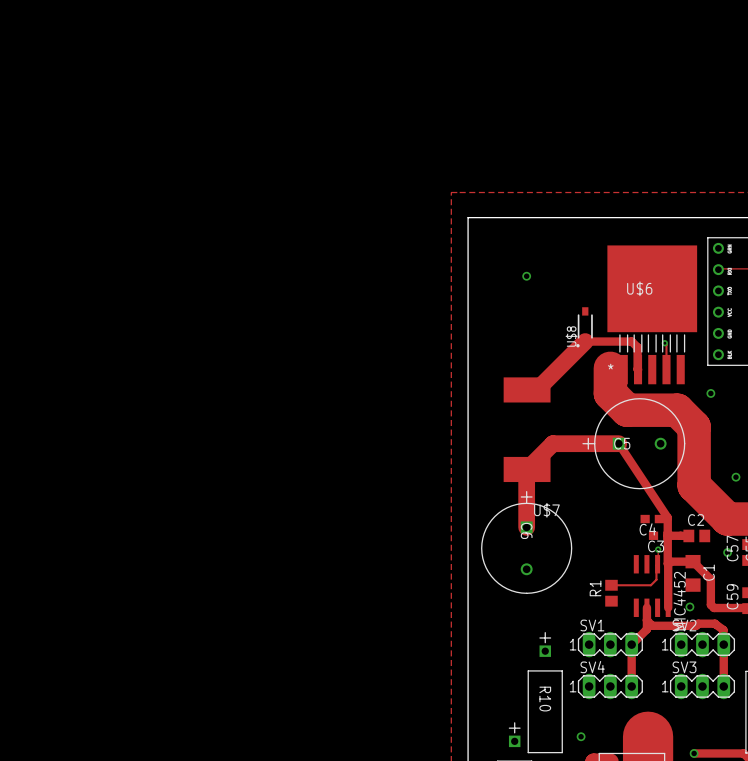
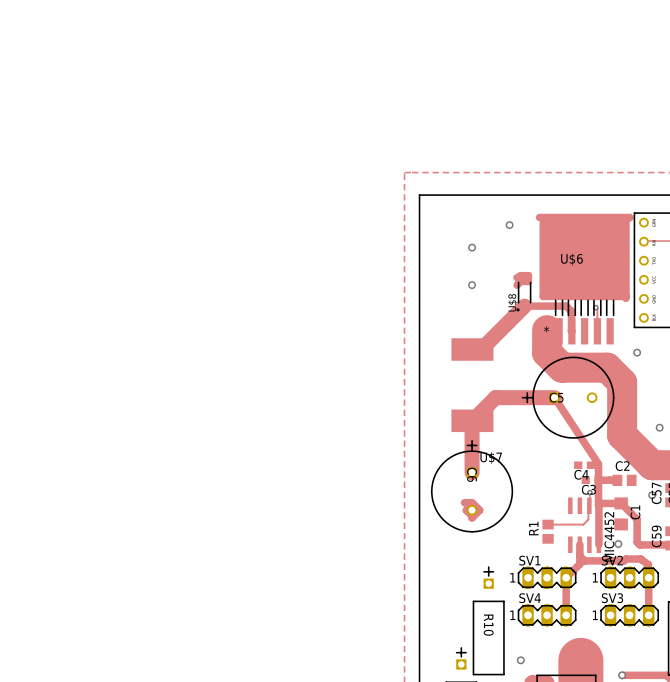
track: none -> (539, 217) (629, 217) (625, 219) (625, 298)
track: none -> (543, 223) (543, 296) (625, 296)
via: none -> (509, 225)
track: none -> (517, 277) (528, 275) (528, 281) (520, 281) (517, 285)
via: none -> (472, 285)
track: none -> (464, 502) (472, 502) (479, 510) (472, 517) (466, 510) (468, 508)

